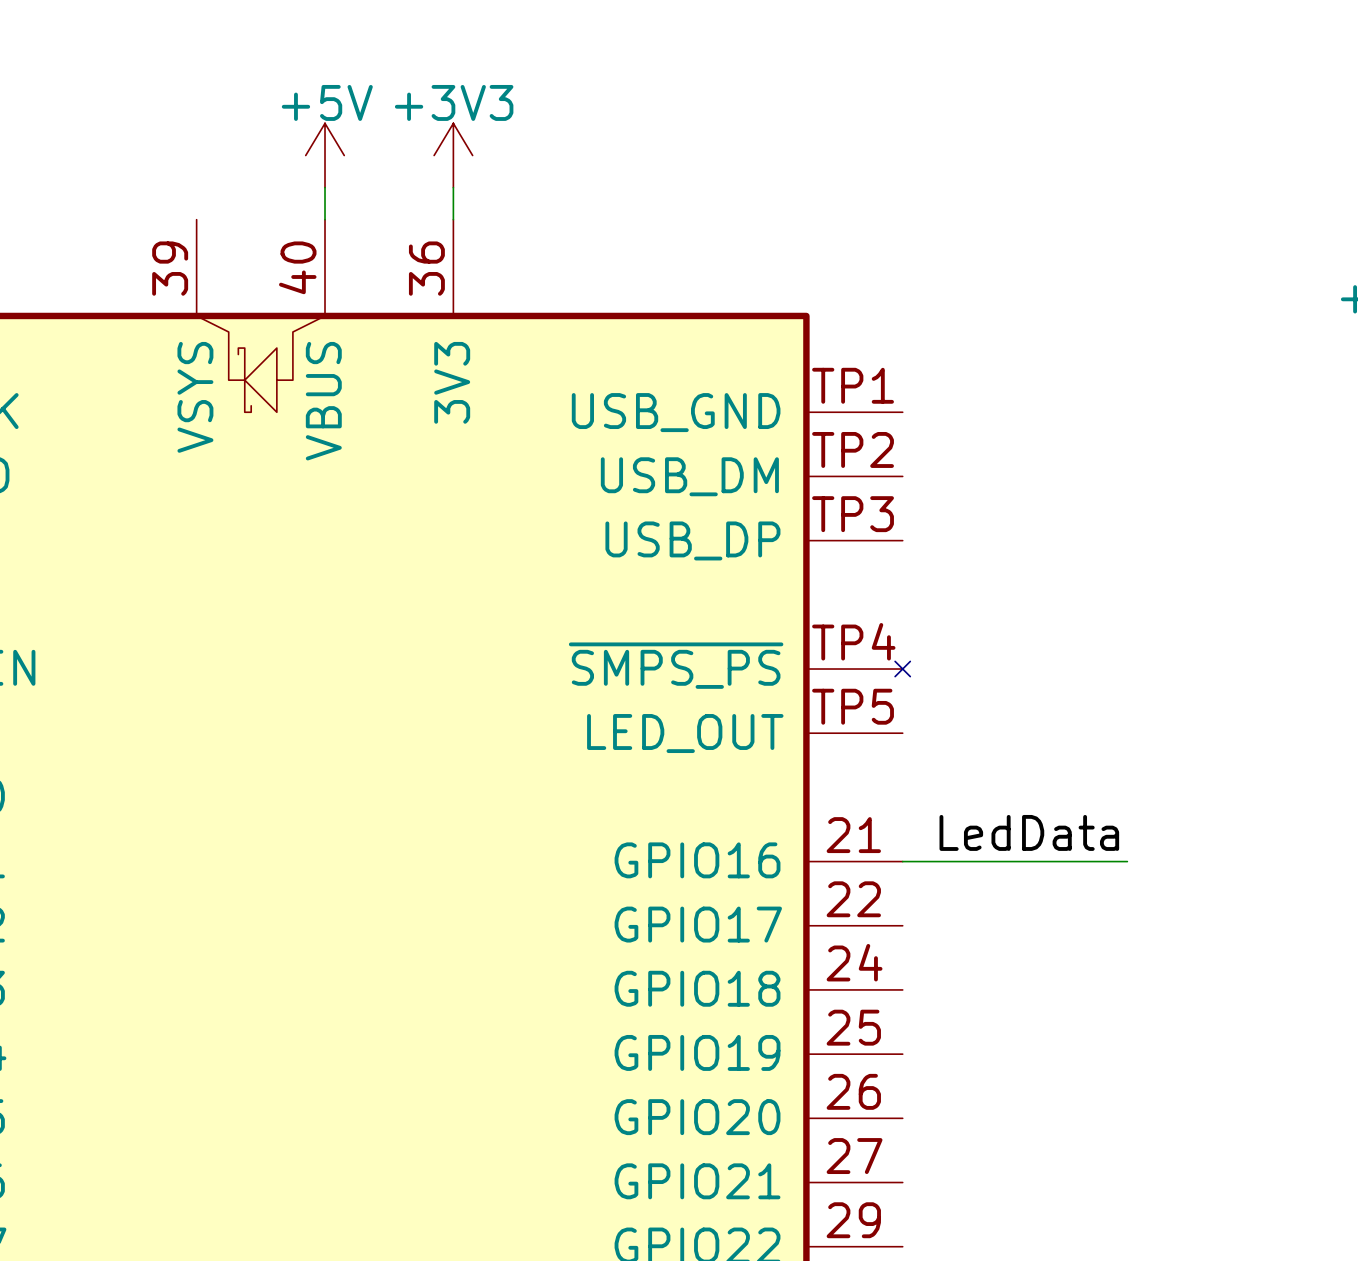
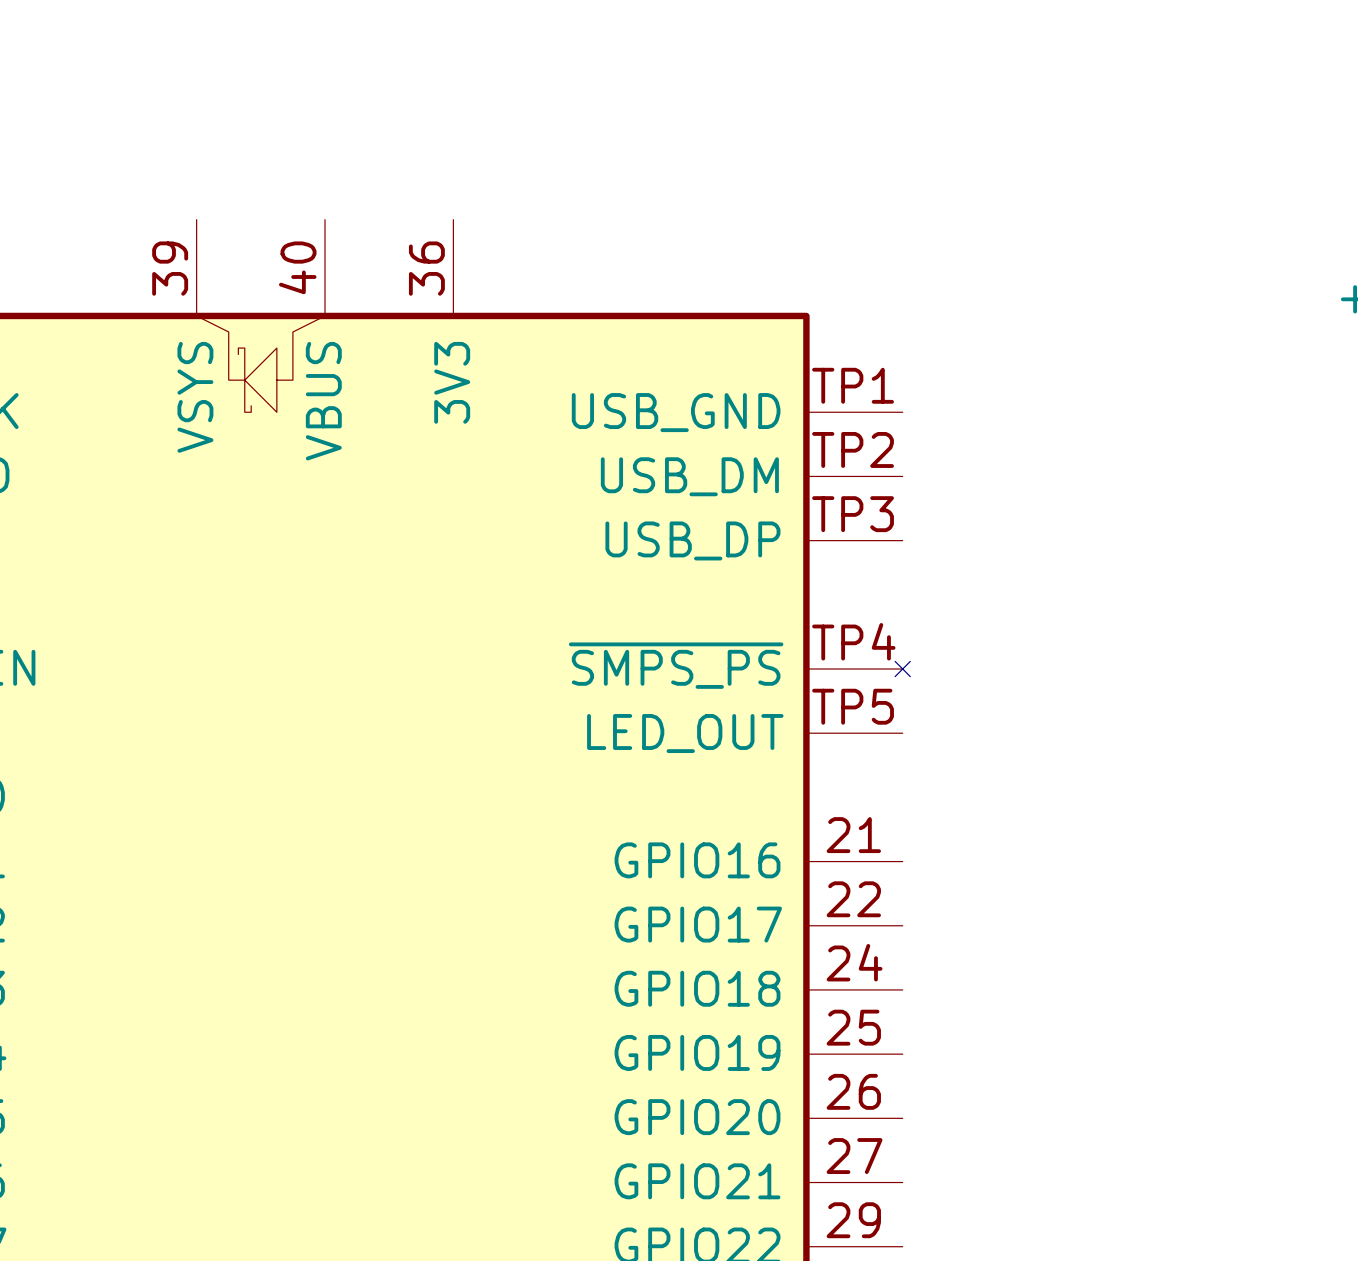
power symbol: +5V (325, 155) -> none
power symbol: +3V3 (453, 155) -> none
wire: (325, 187) (325, 219) -> none
wire: (453, 187) (453, 219) -> none
label: LedData (1029, 832) -> none
wire: (902, 861) (1127, 861) -> none

